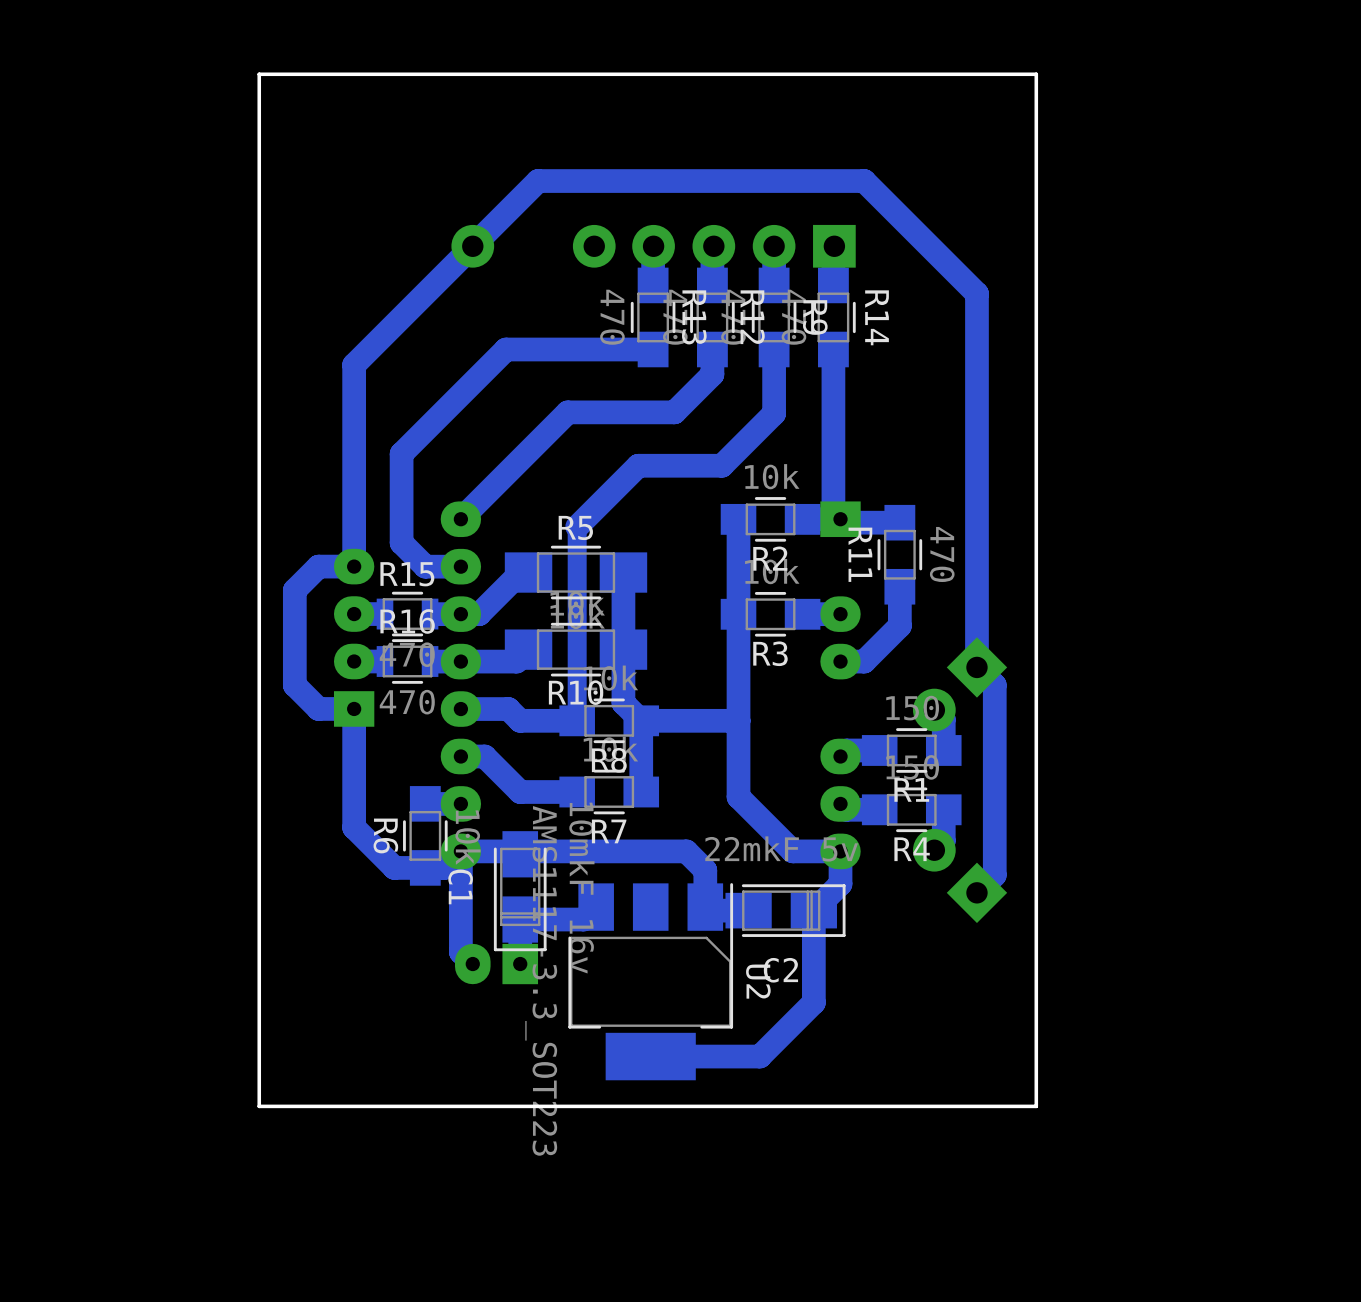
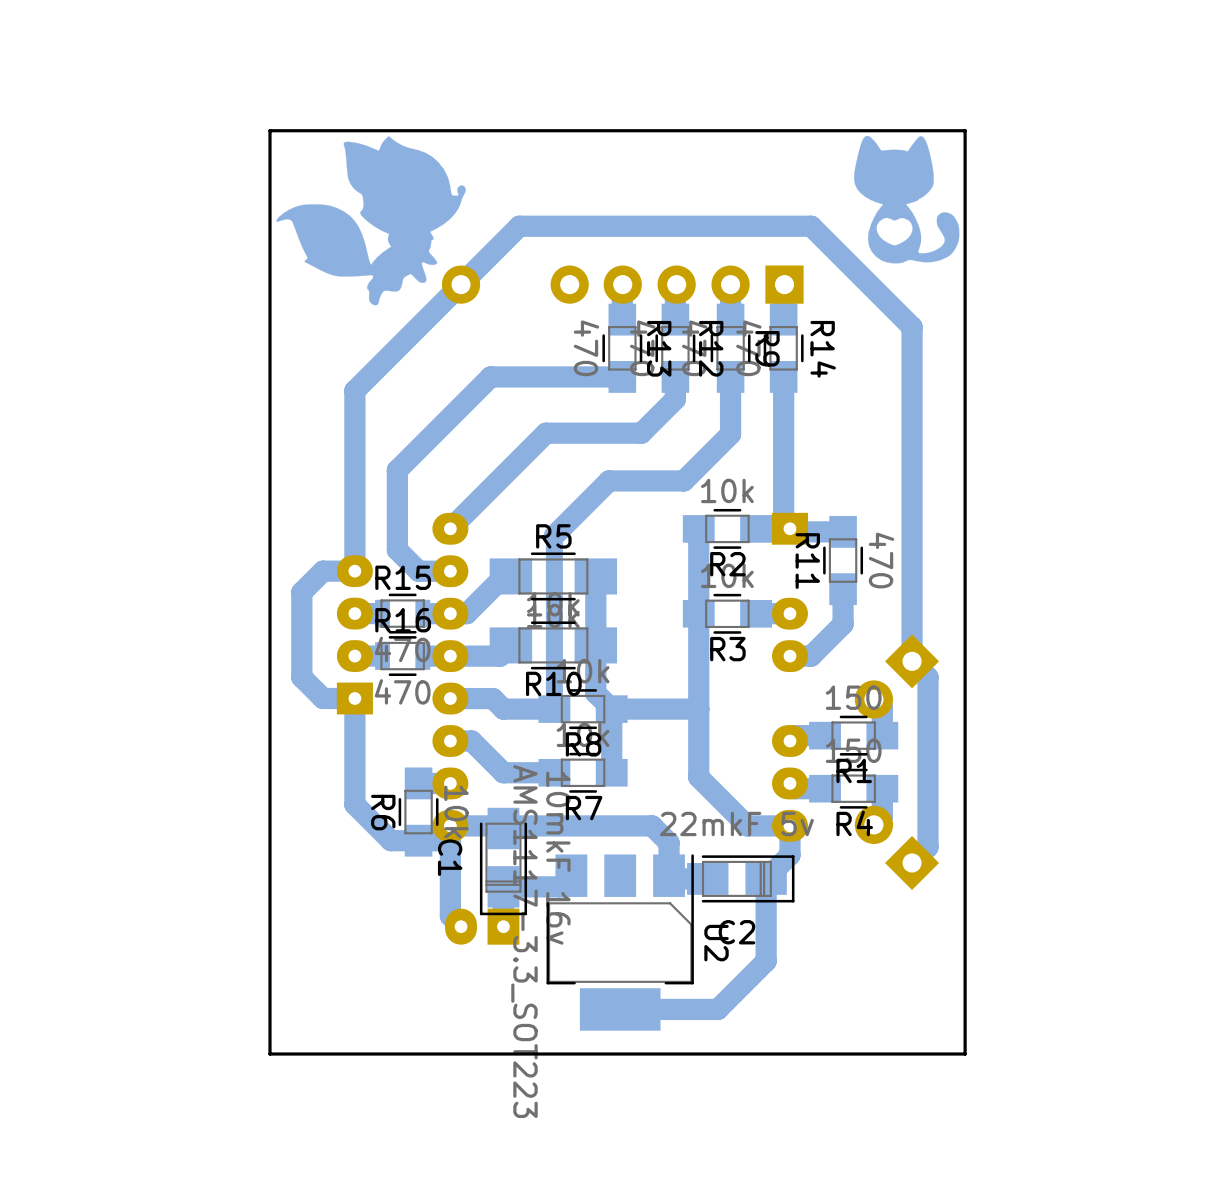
drawing: none -> [854, 135, 960, 264]
drawing: none -> [276, 136, 466, 306]

